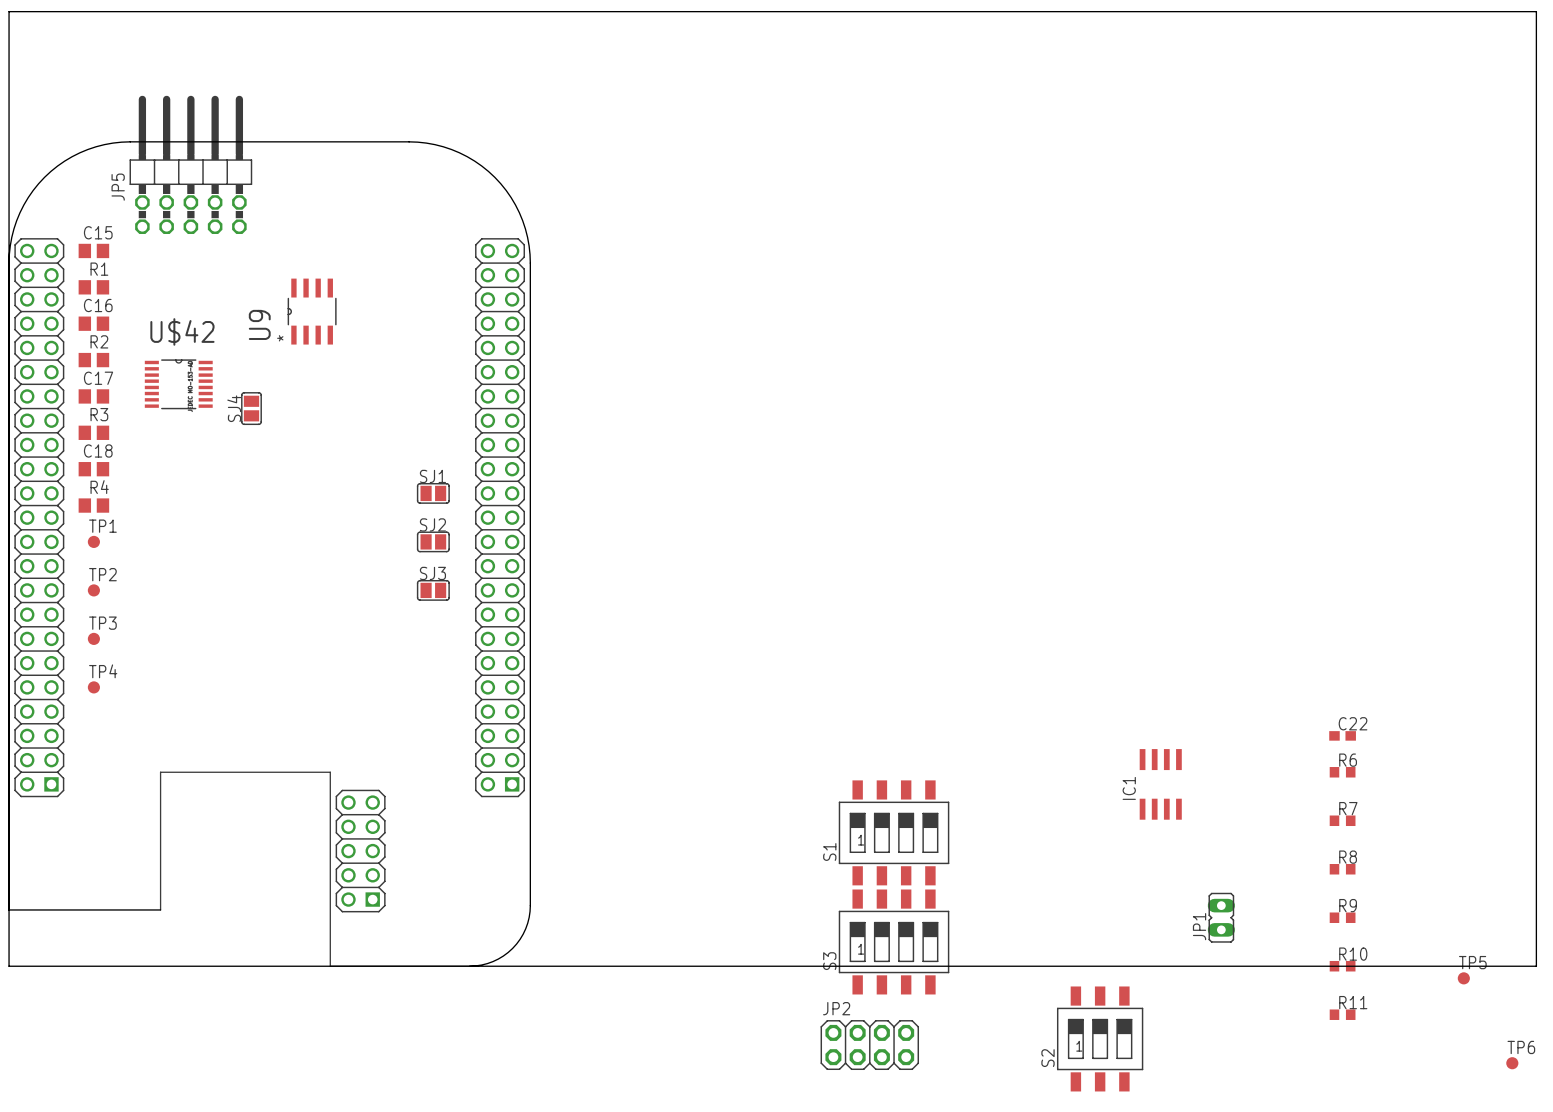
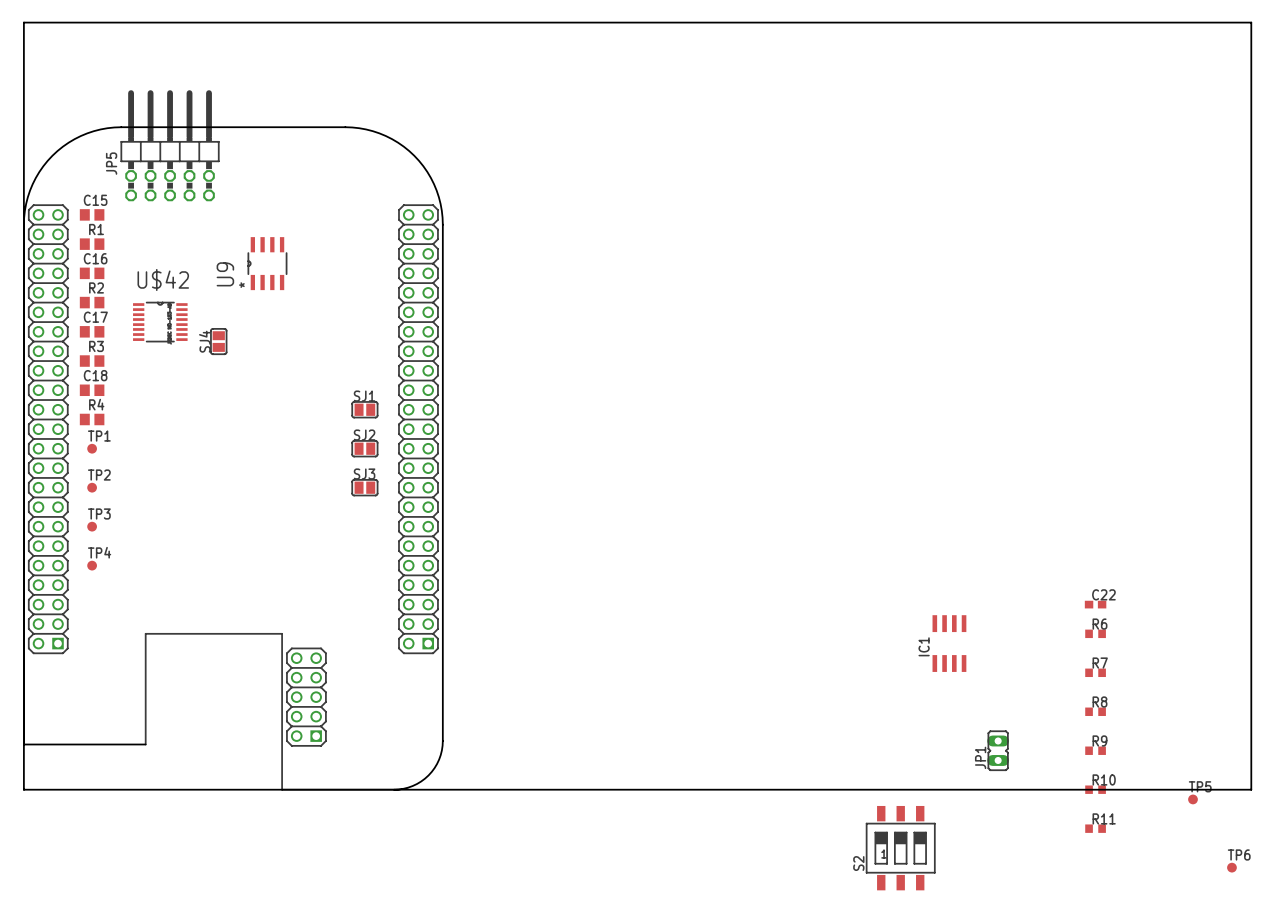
S1: (894, 832) -> none
S3: (894, 941) -> none
JP2: (869, 1045) -> none

